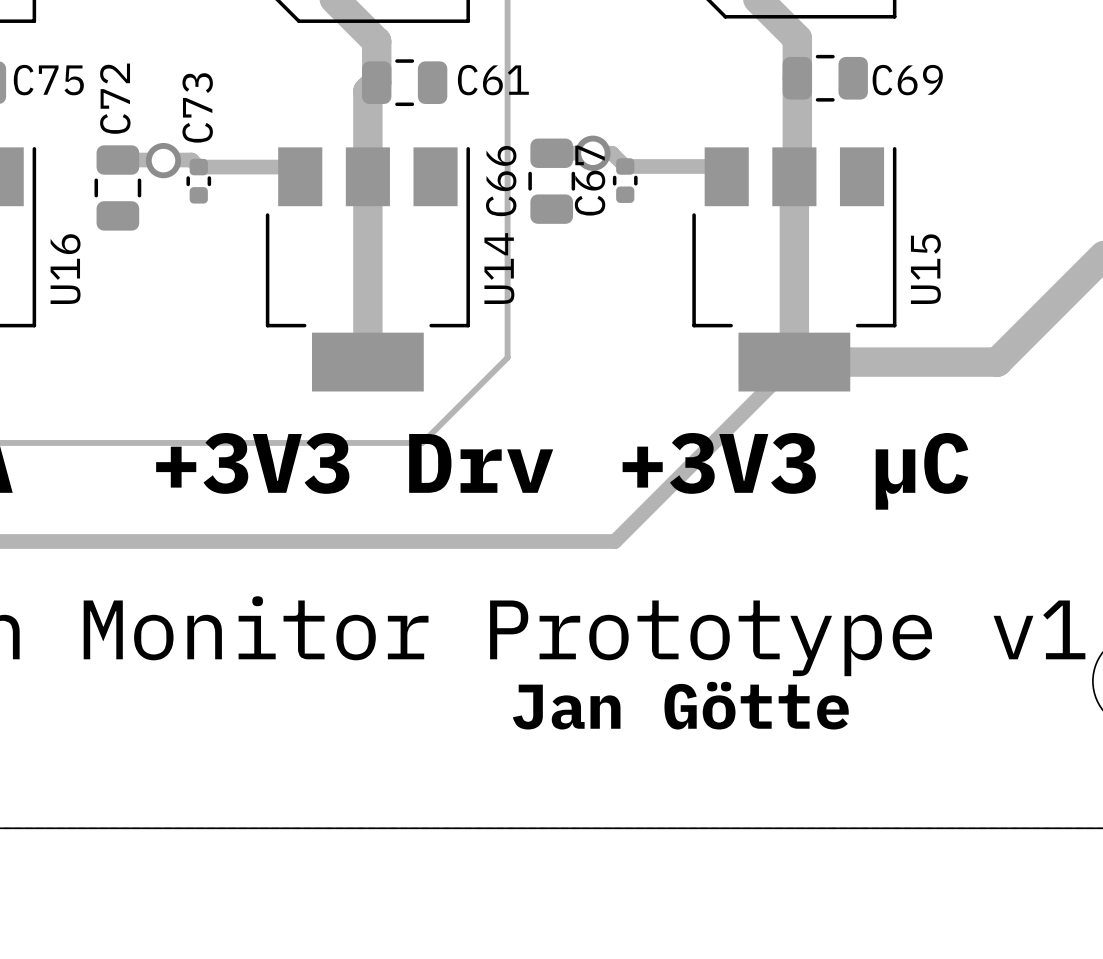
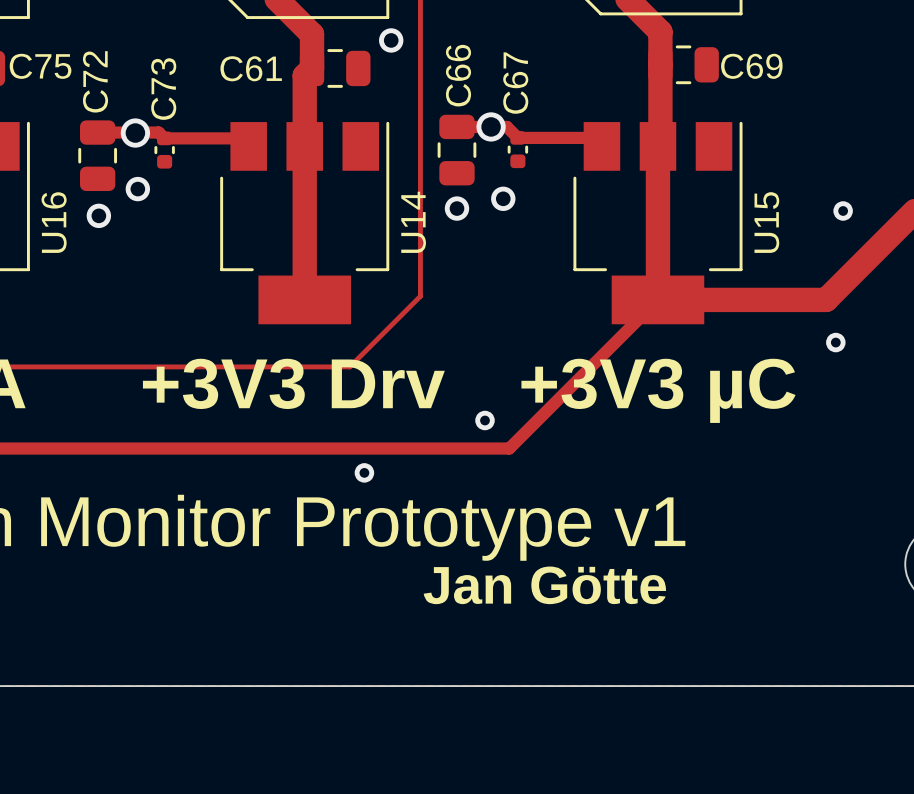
via: none -> (391, 40)
C61 name position: C61 (493, 80) -> C61 (251, 68)
C67 name position: C67 (590, 180) -> C67 (515, 83)
C66 name position: C66 (501, 181) -> C66 (458, 75)
via: none -> (137, 189)
via: none -> (503, 198)
via: none -> (456, 208)
via: none -> (843, 210)
via: none -> (98, 215)
via: none -> (835, 342)
via: none -> (485, 420)
via: none -> (364, 472)

